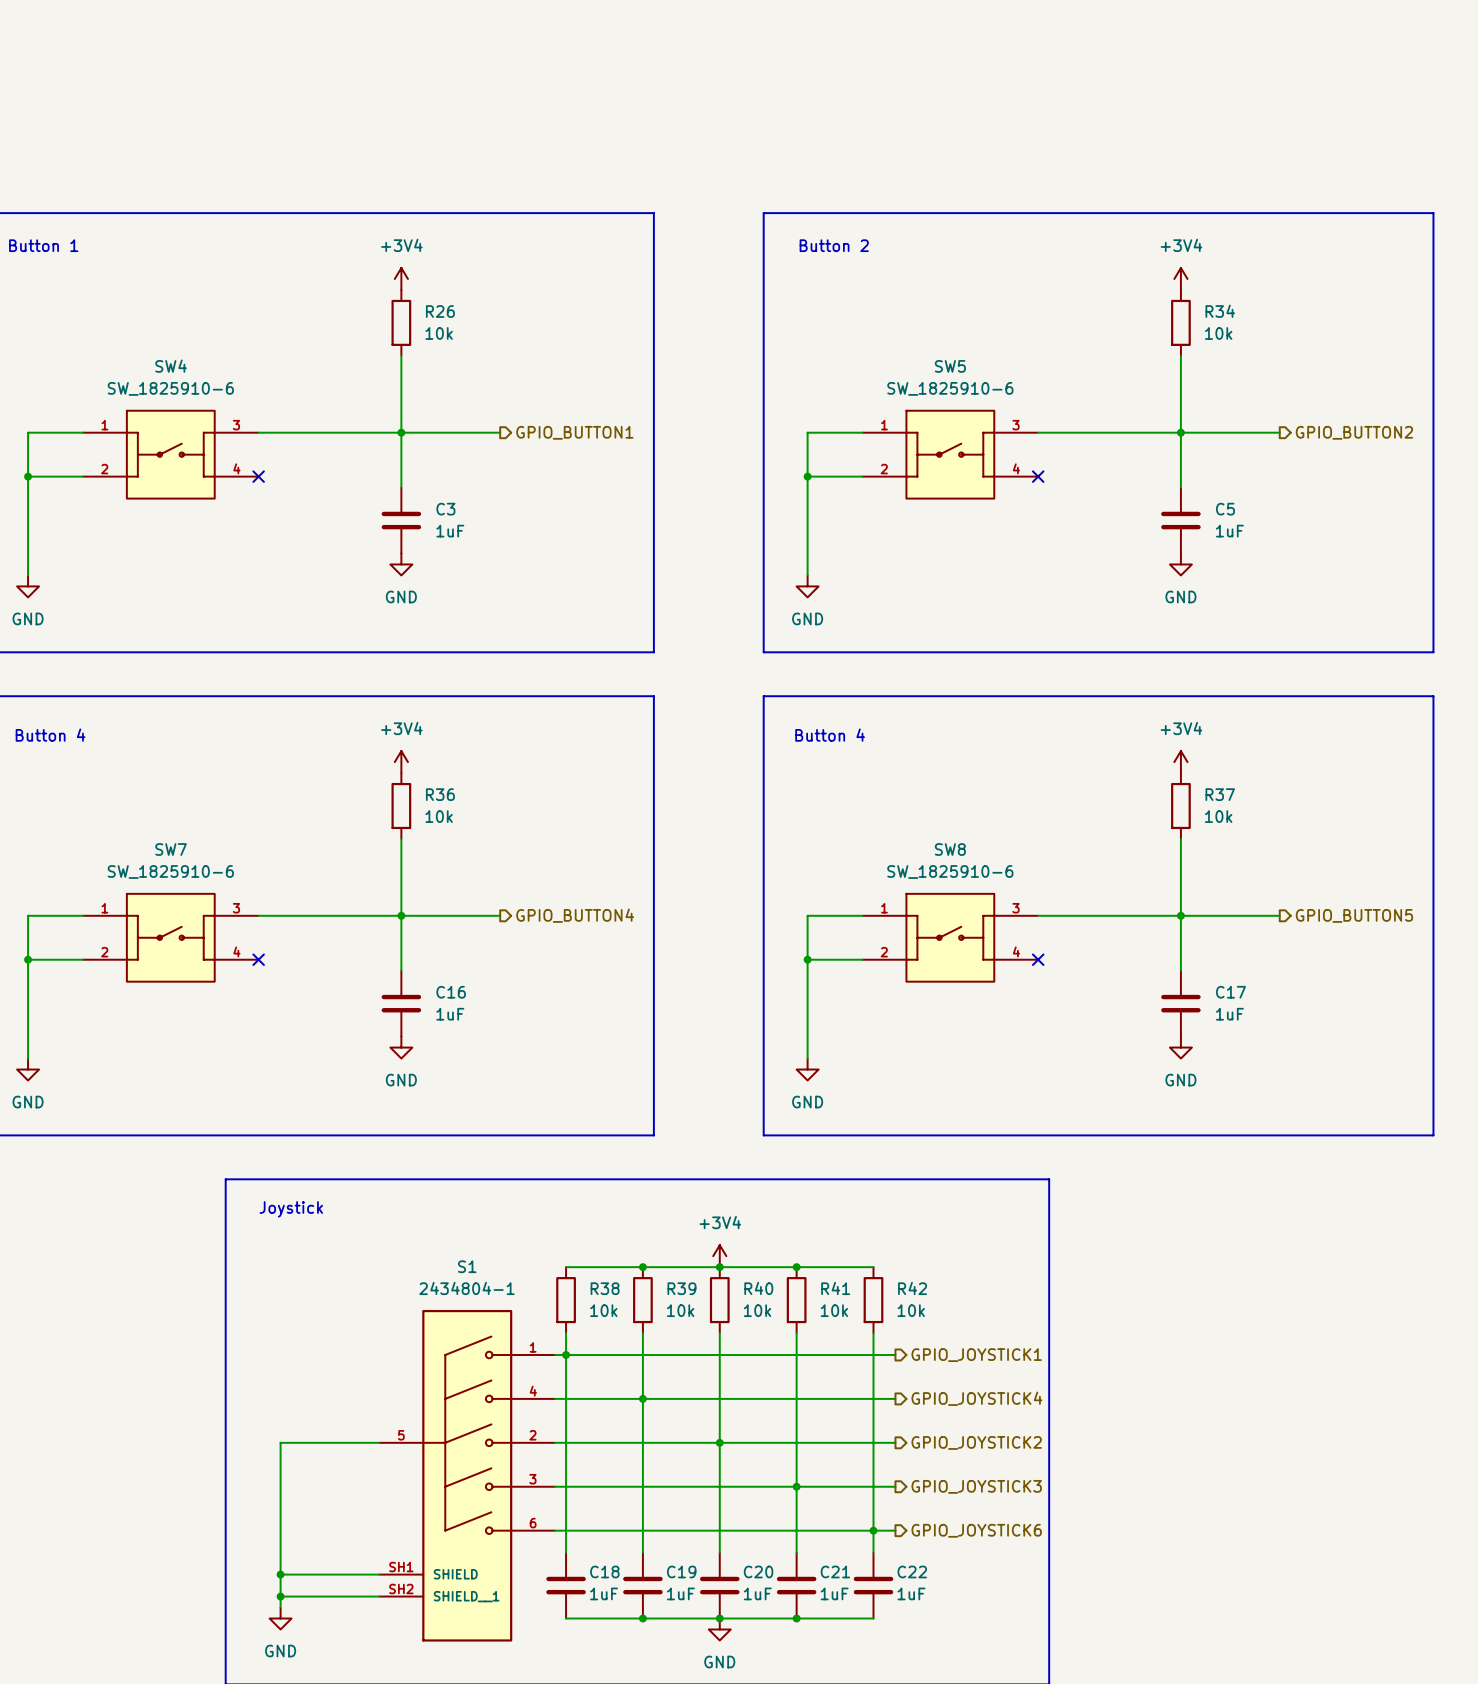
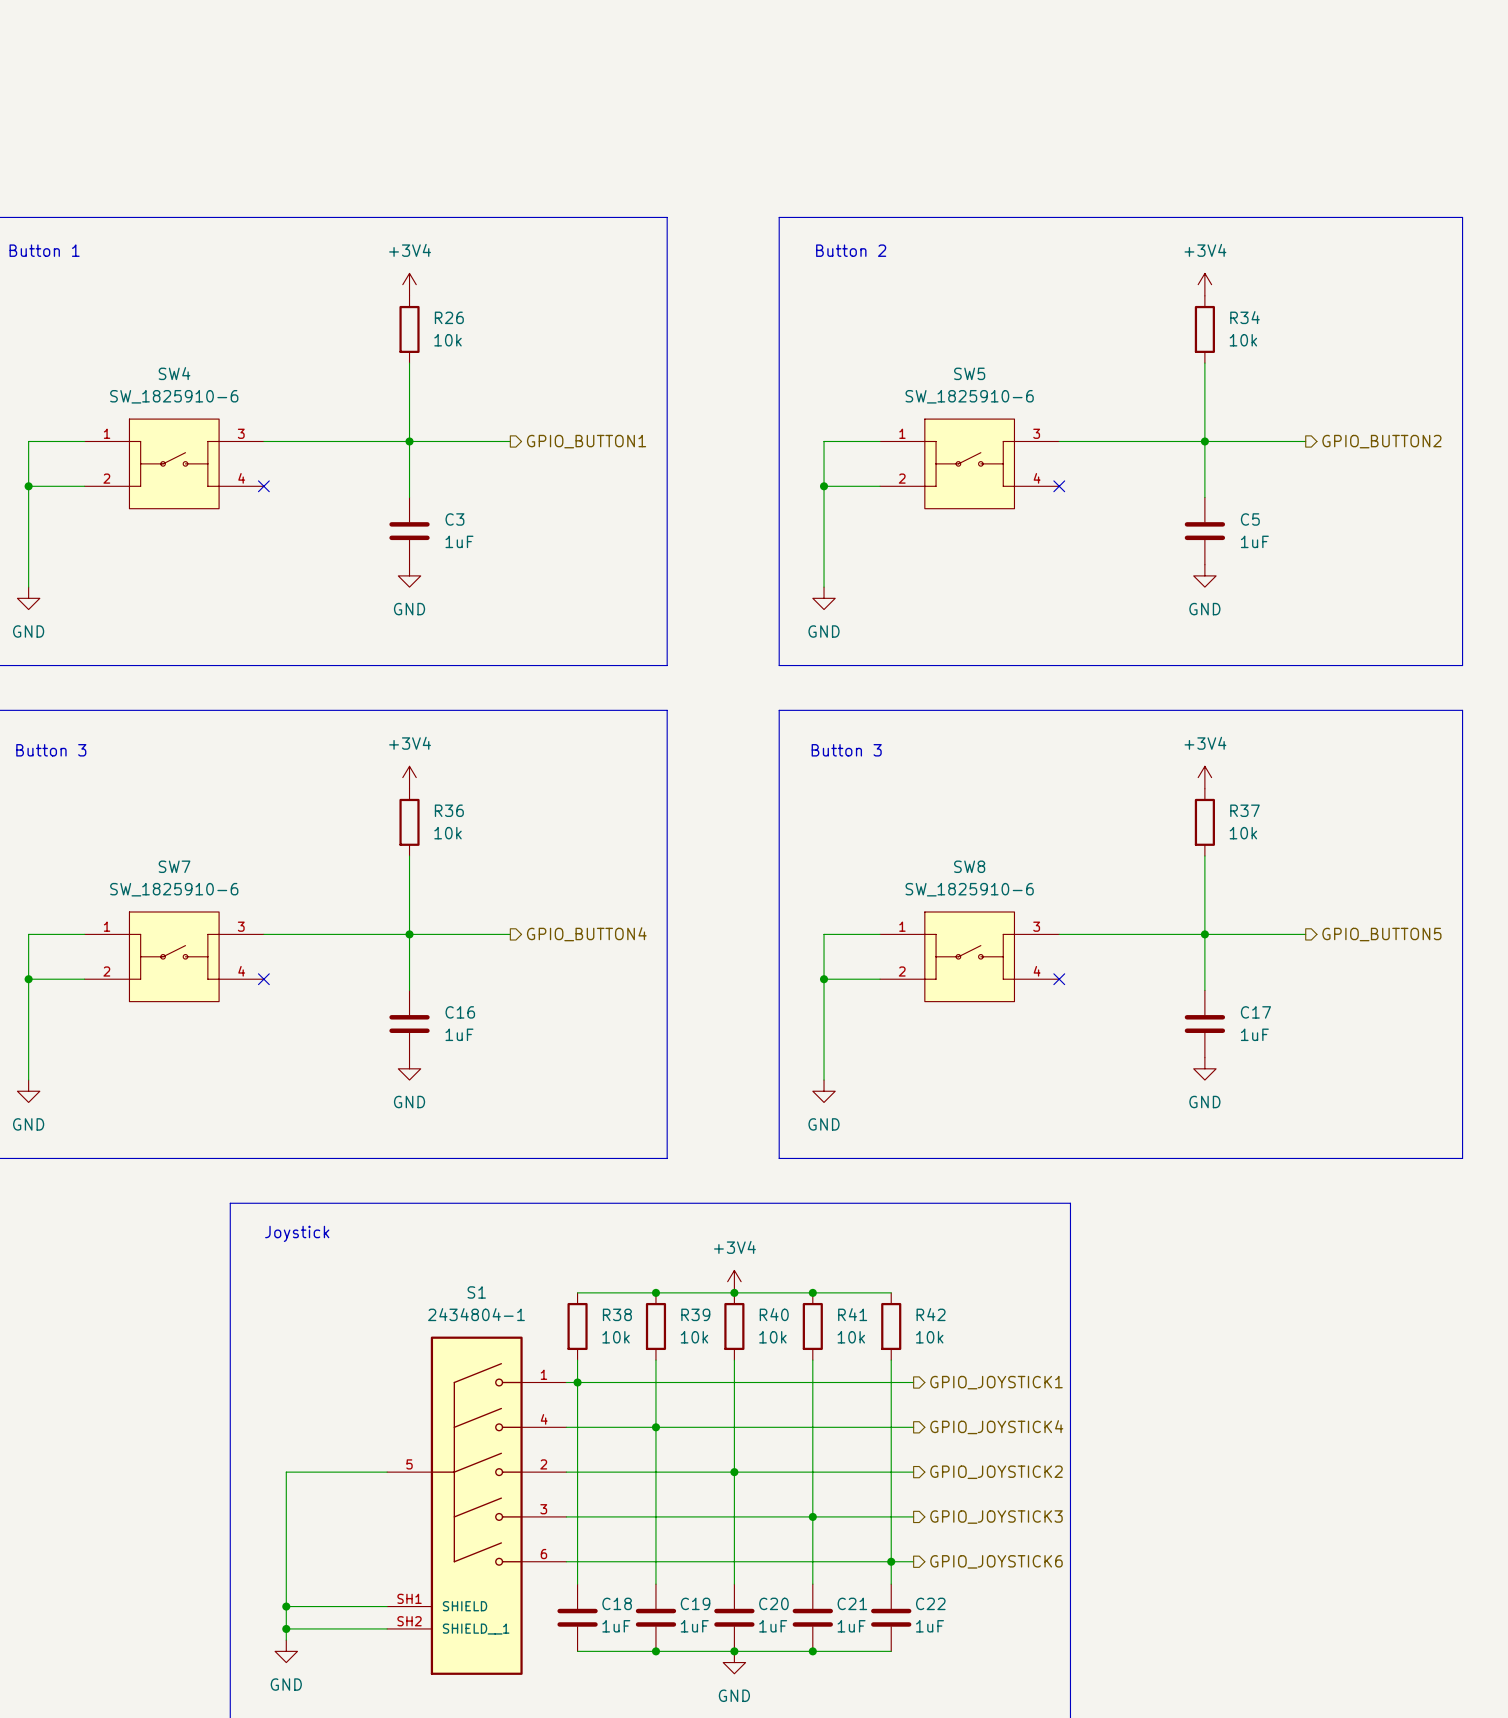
text: Button 4 (50, 735) -> Button 3 (51, 750)
text: Button 4 (830, 735) -> Button 3 (846, 750)

